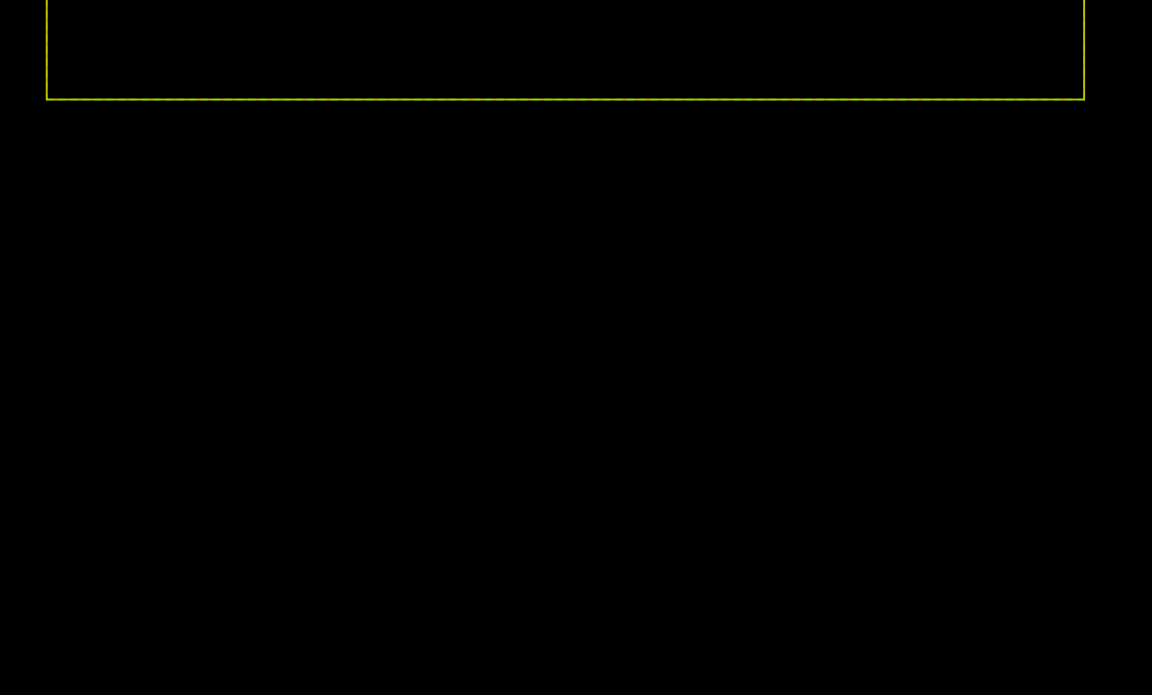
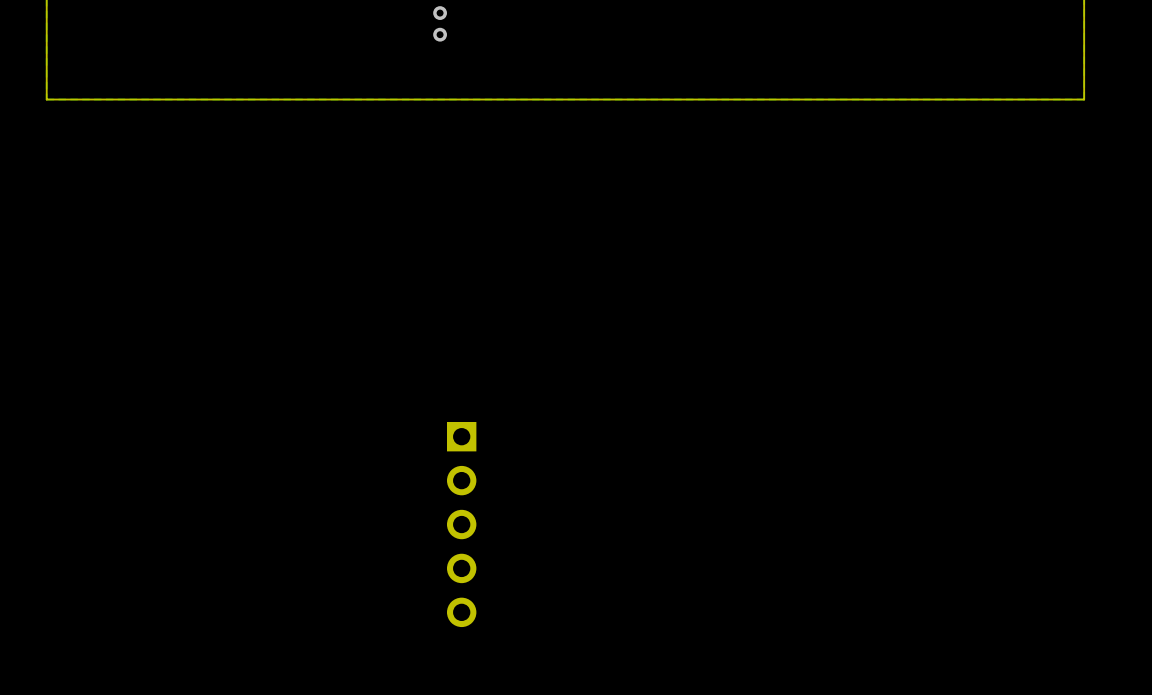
via: none -> (440, 13)
via: none -> (440, 34)
part: none -> (461, 524)

